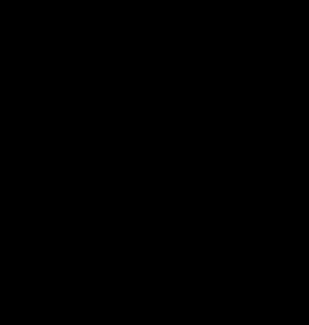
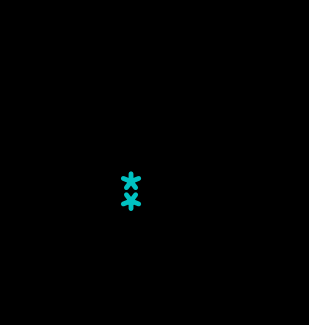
part: none -> (131, 191)

